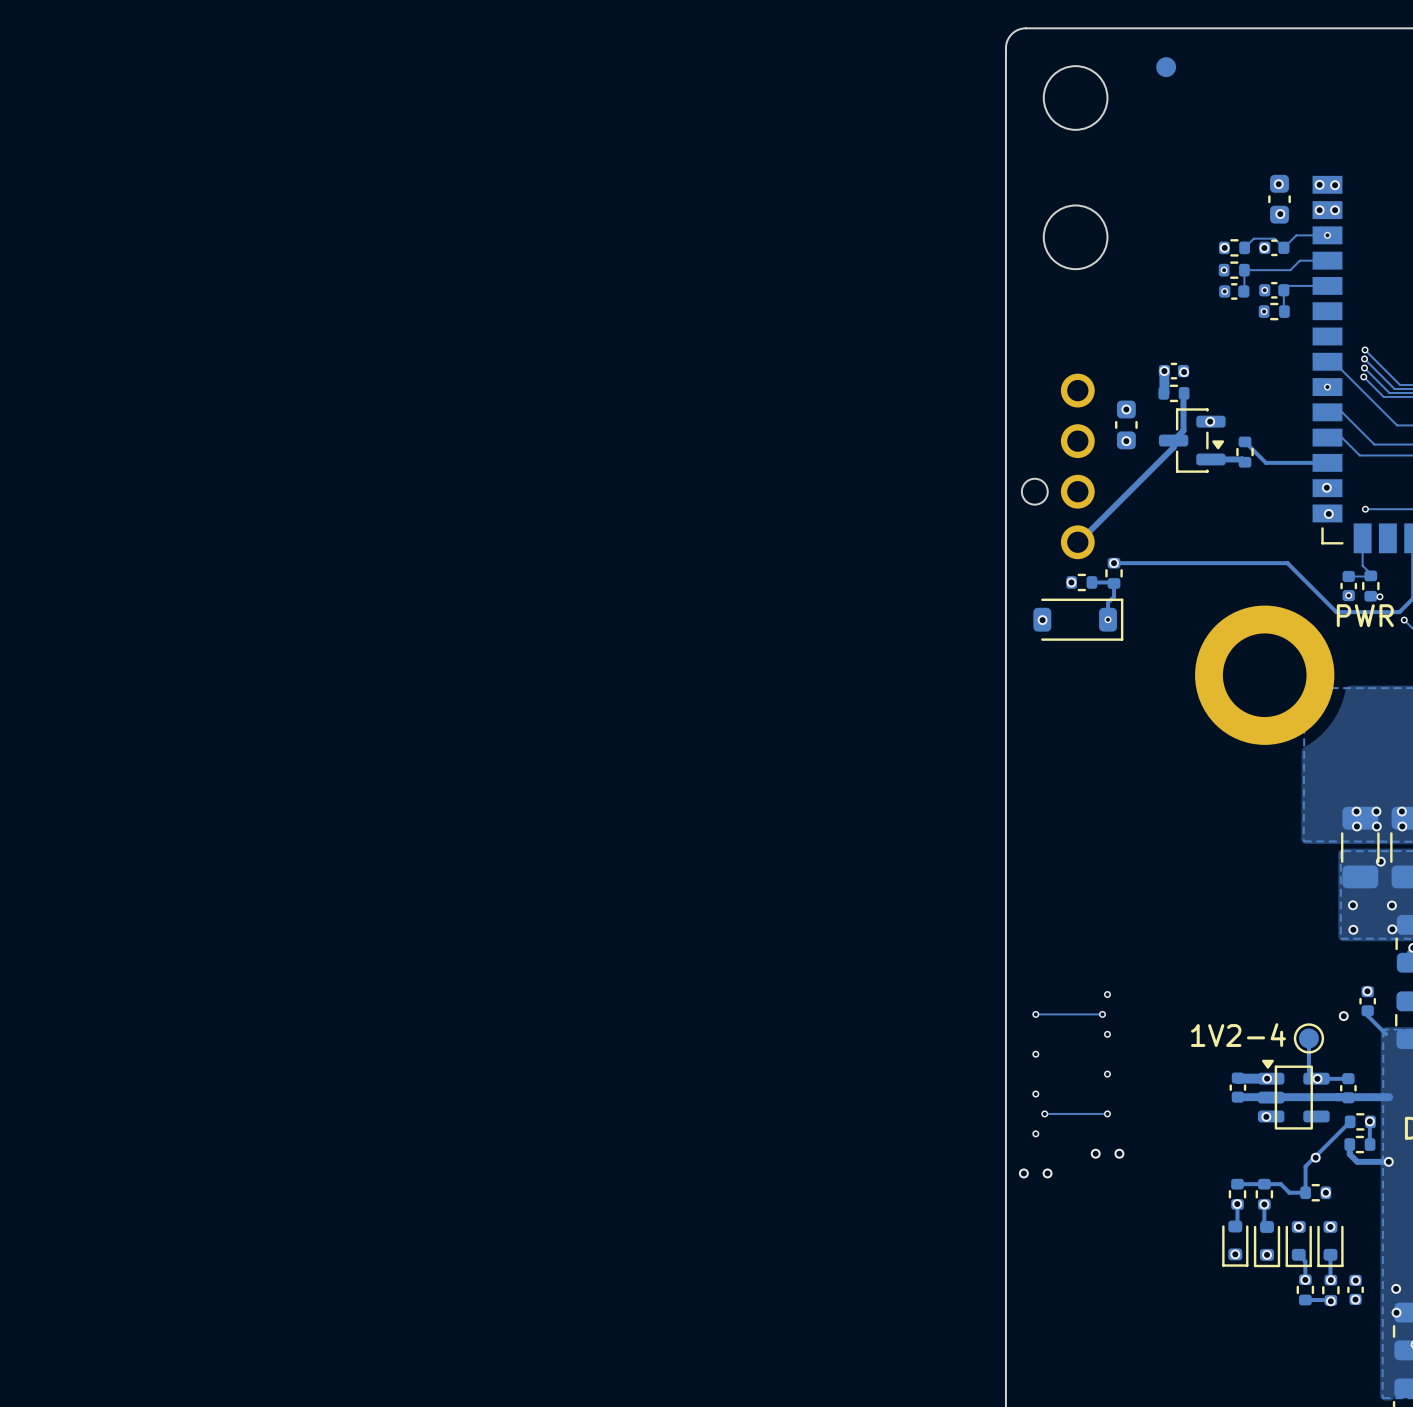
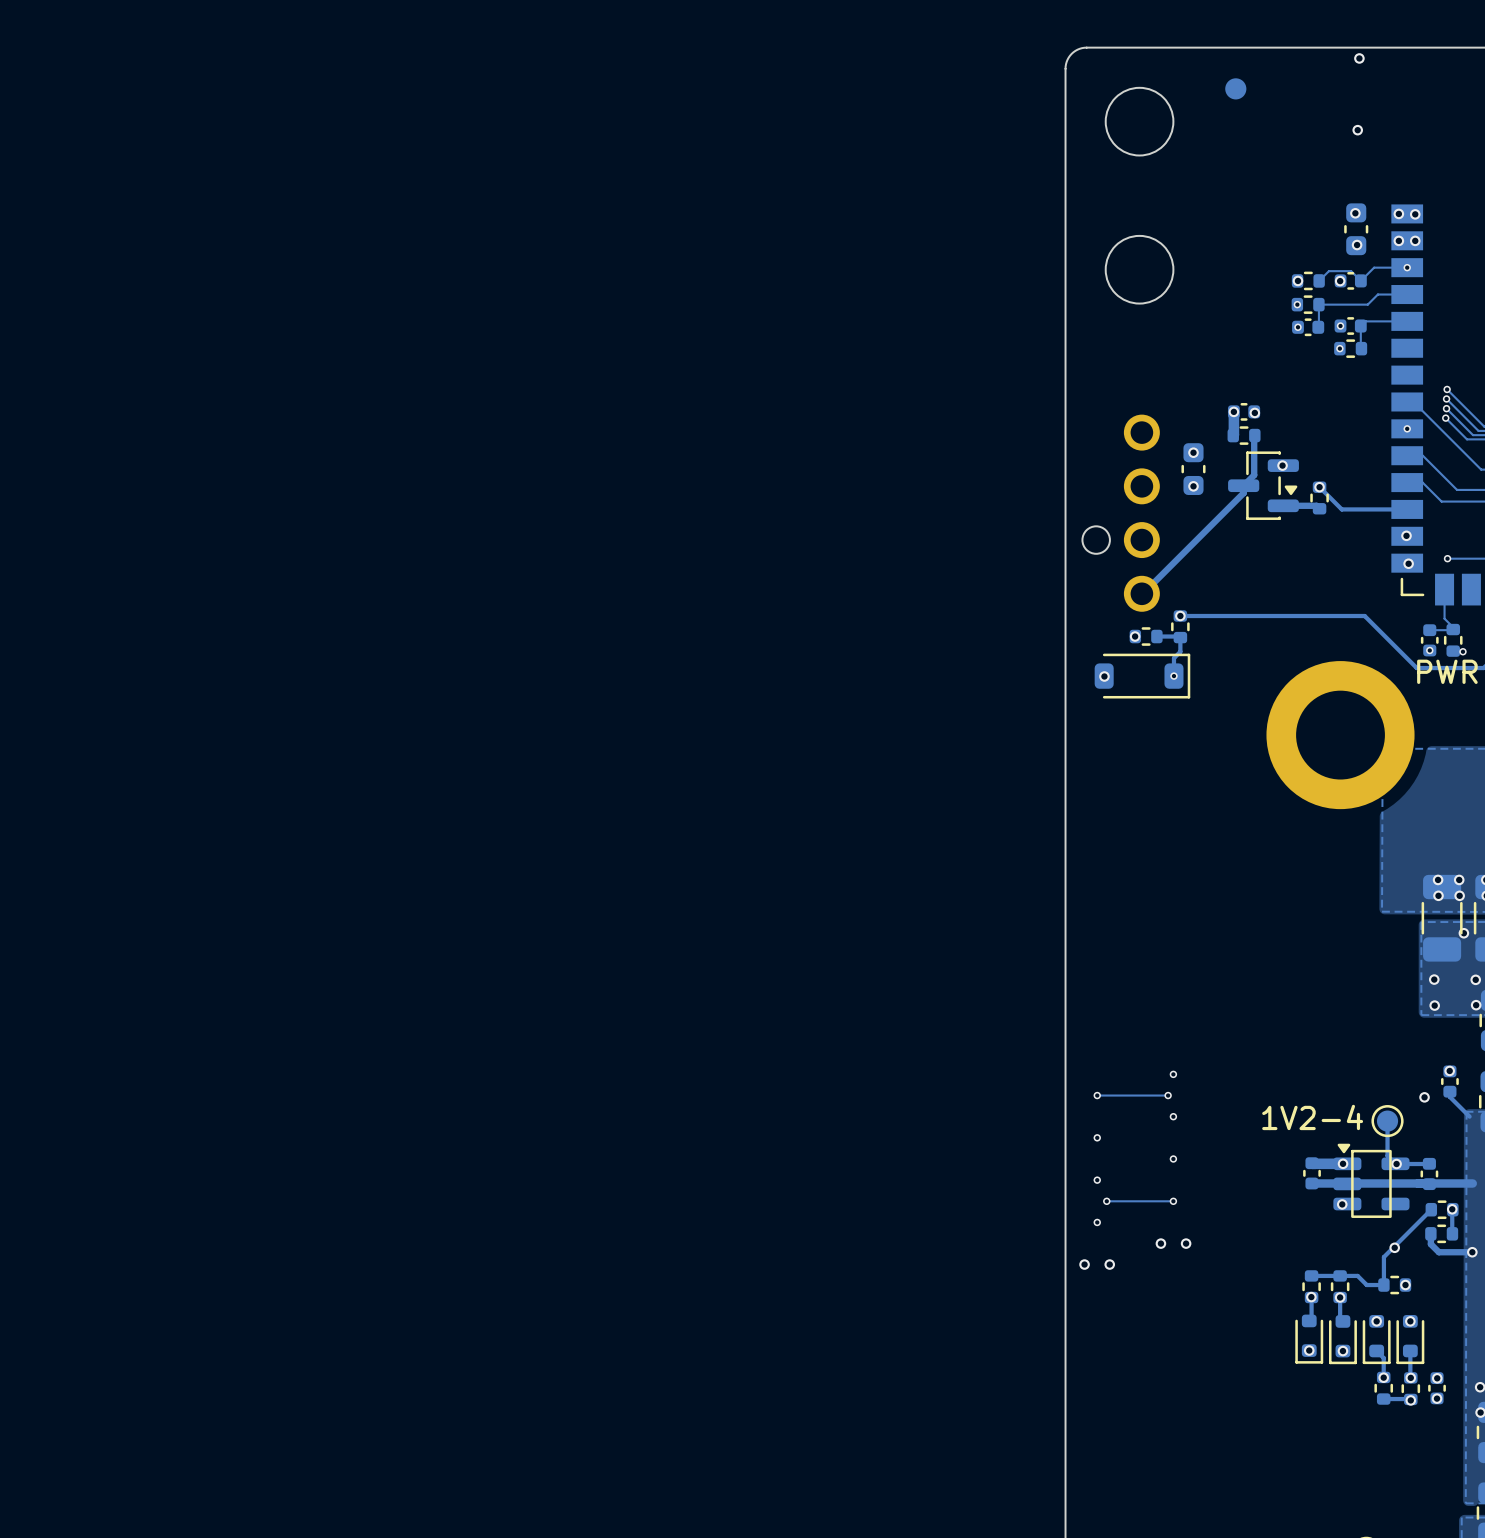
via: none -> (1359, 58)
via: none -> (1357, 130)
via: none -> (1319, 487)

